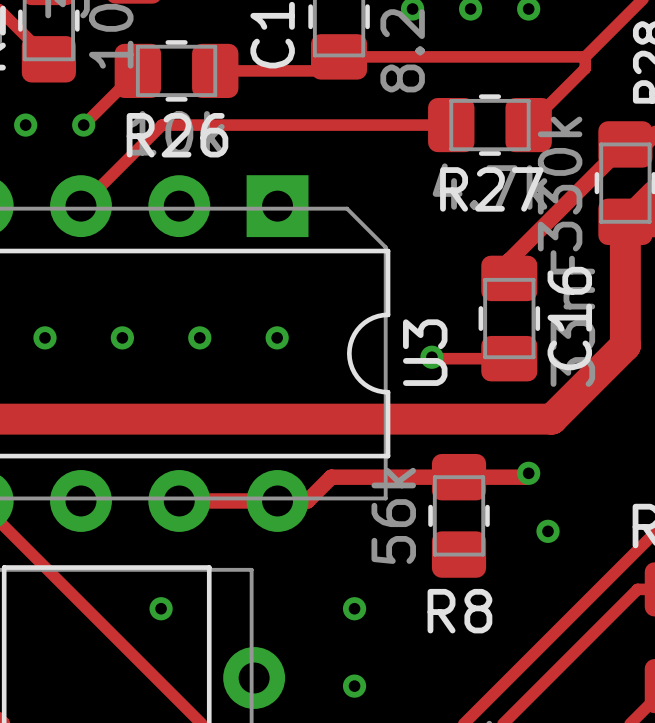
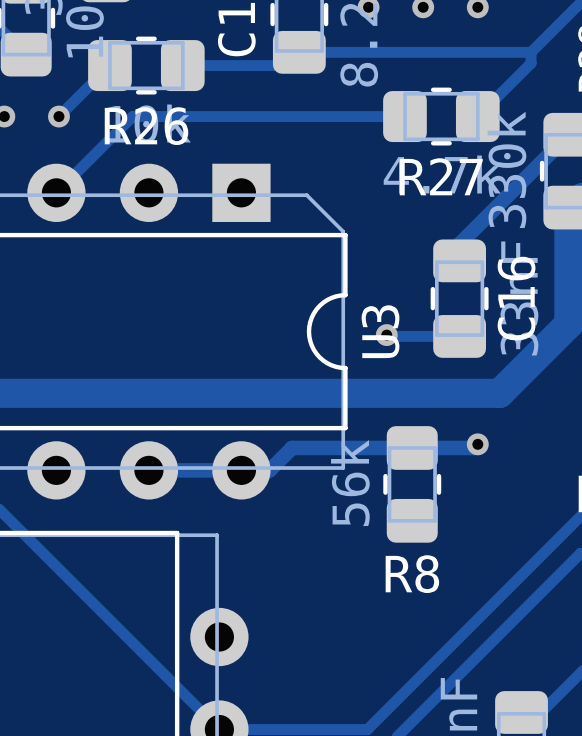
via: (45, 337) -> none
via: (122, 337) -> none
via: (199, 337) -> none
via: (277, 337) -> none
via: (548, 531) -> none
via: (161, 608) -> none
via: (354, 608) -> none
via: (354, 686) -> none

